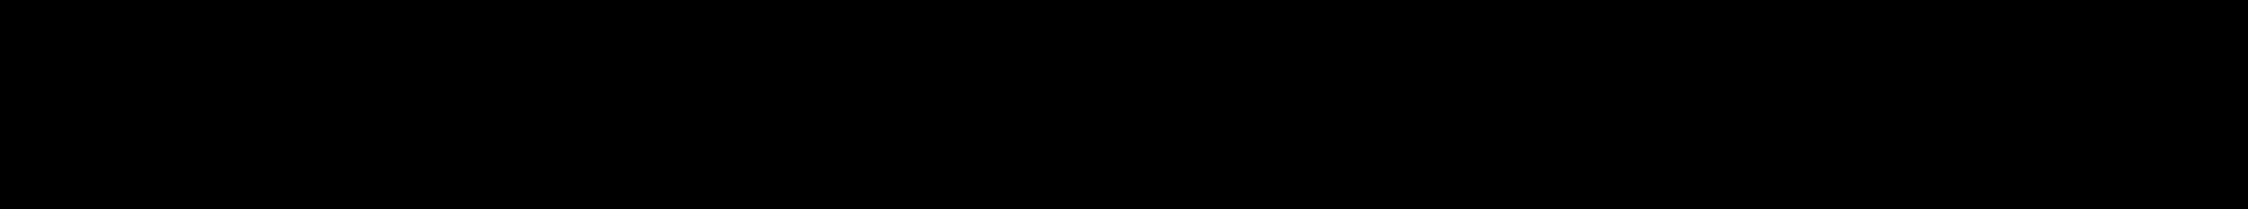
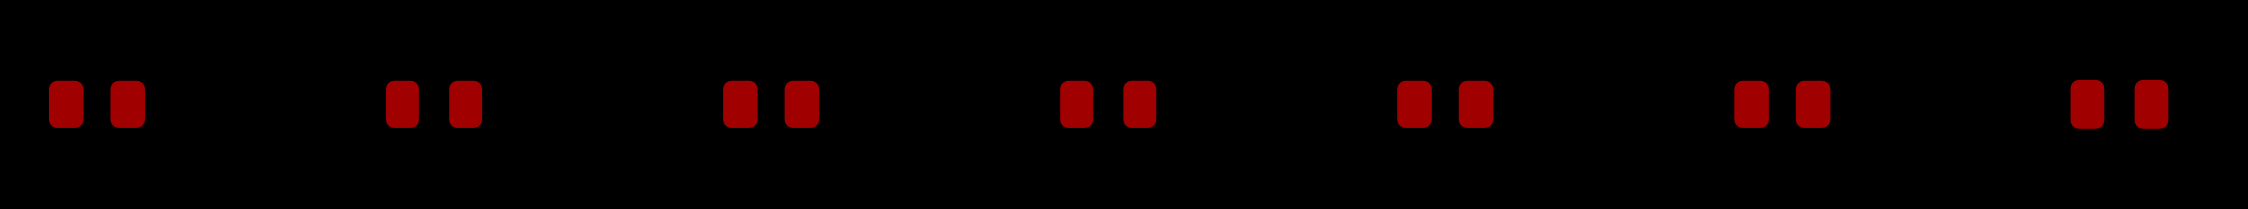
part: none -> (96, 104)
part: none -> (434, 104)
part: none -> (771, 104)
part: none -> (1108, 104)
part: none -> (1445, 104)
part: none -> (1782, 104)
part: none -> (2119, 104)

